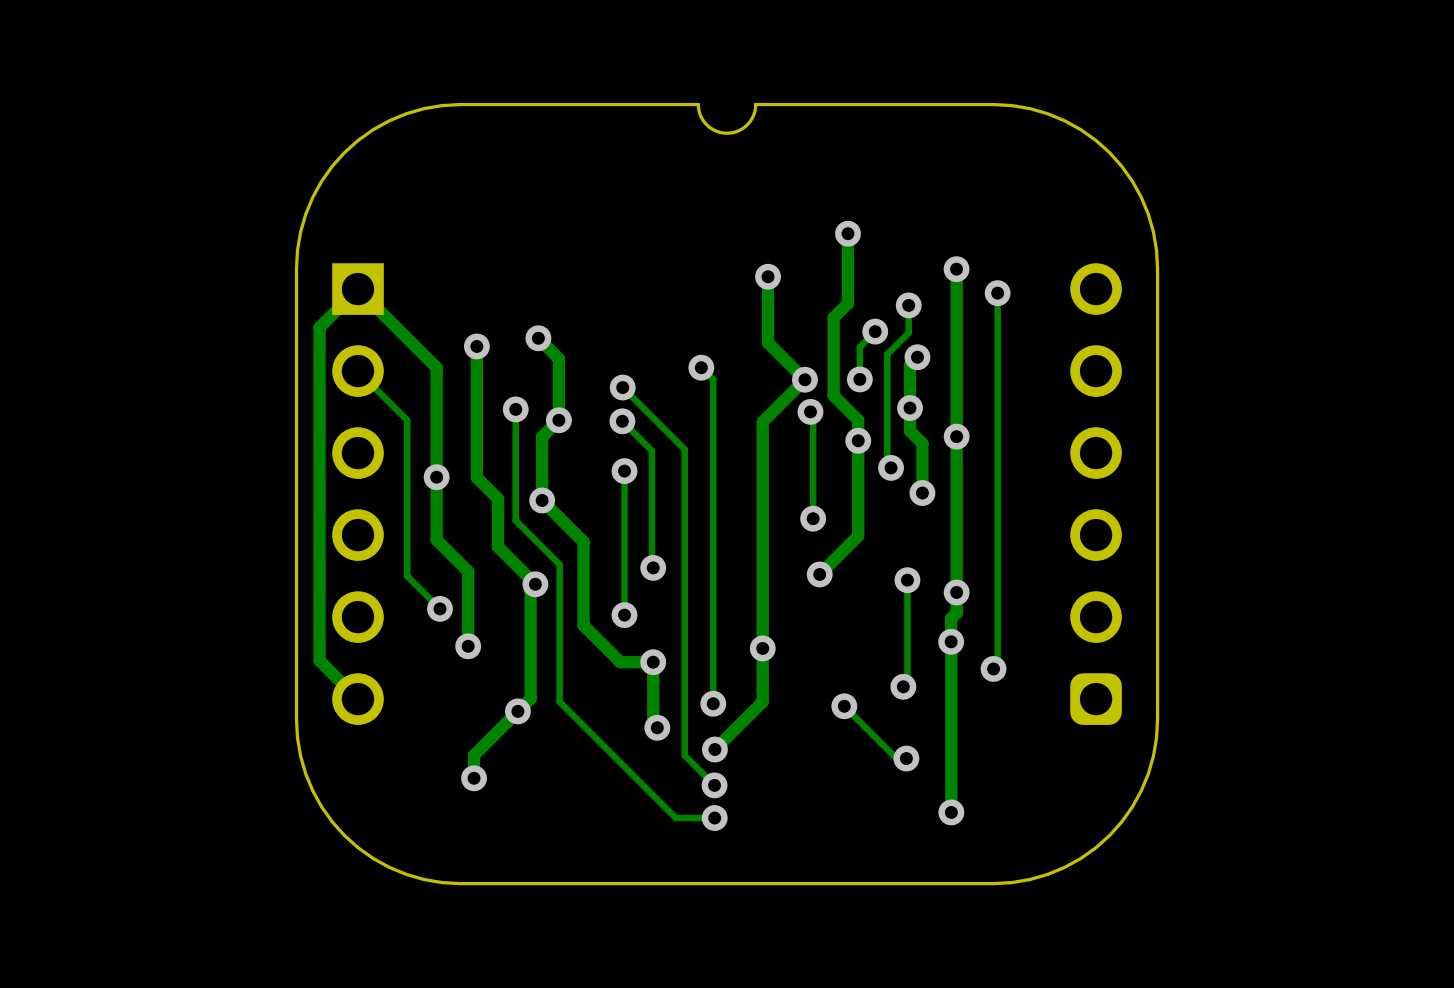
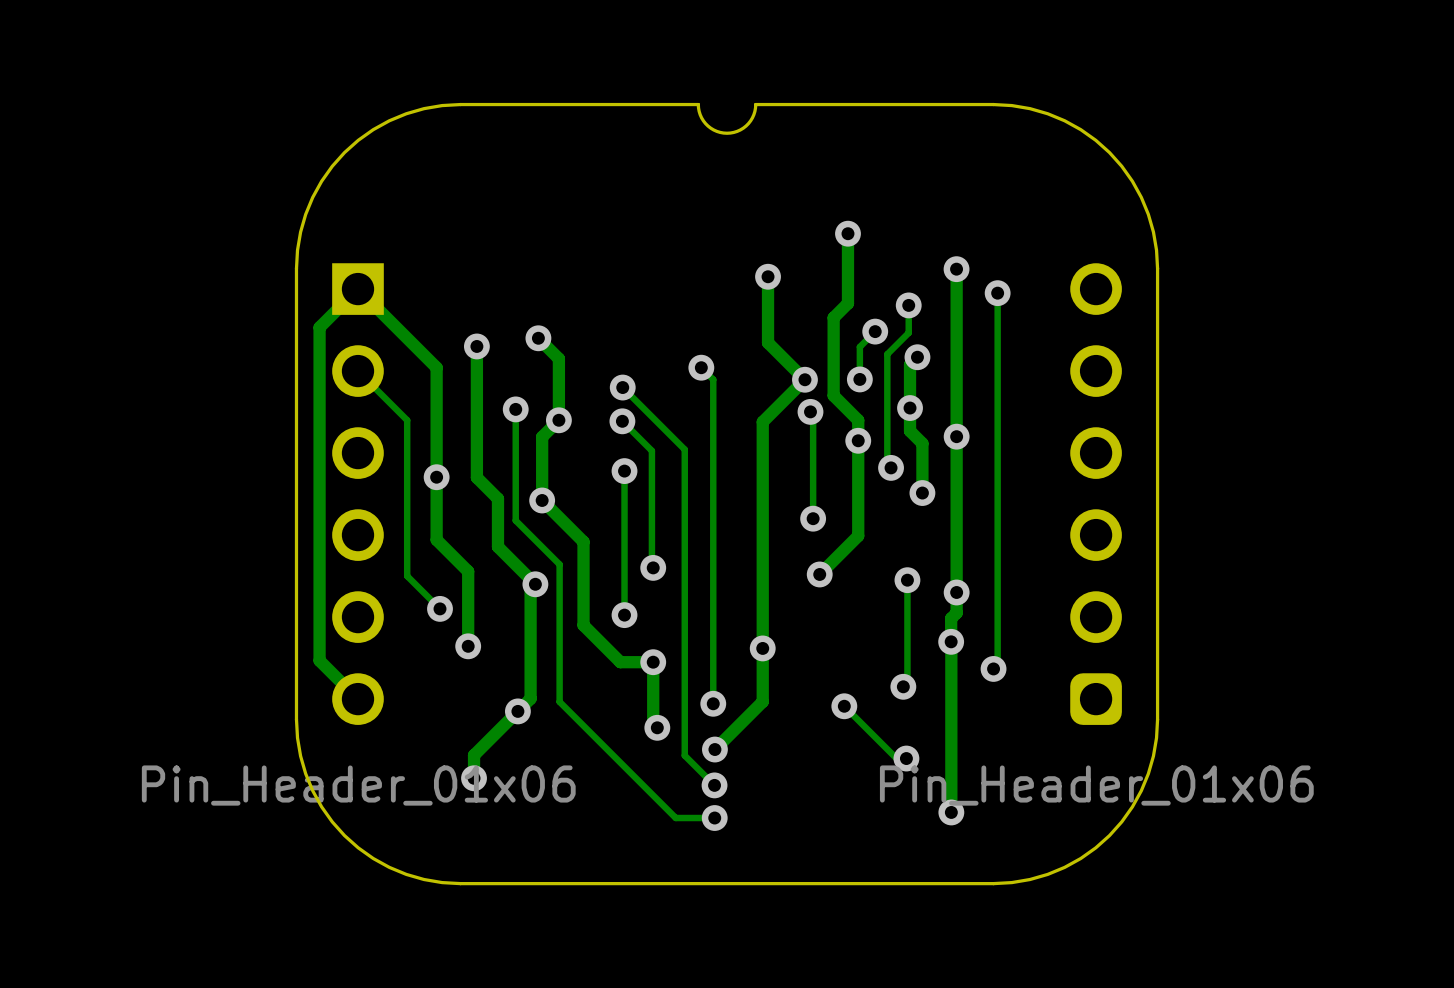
drawing: none -> [141, 765, 576, 806]
drawing: none -> [879, 765, 1314, 806]

